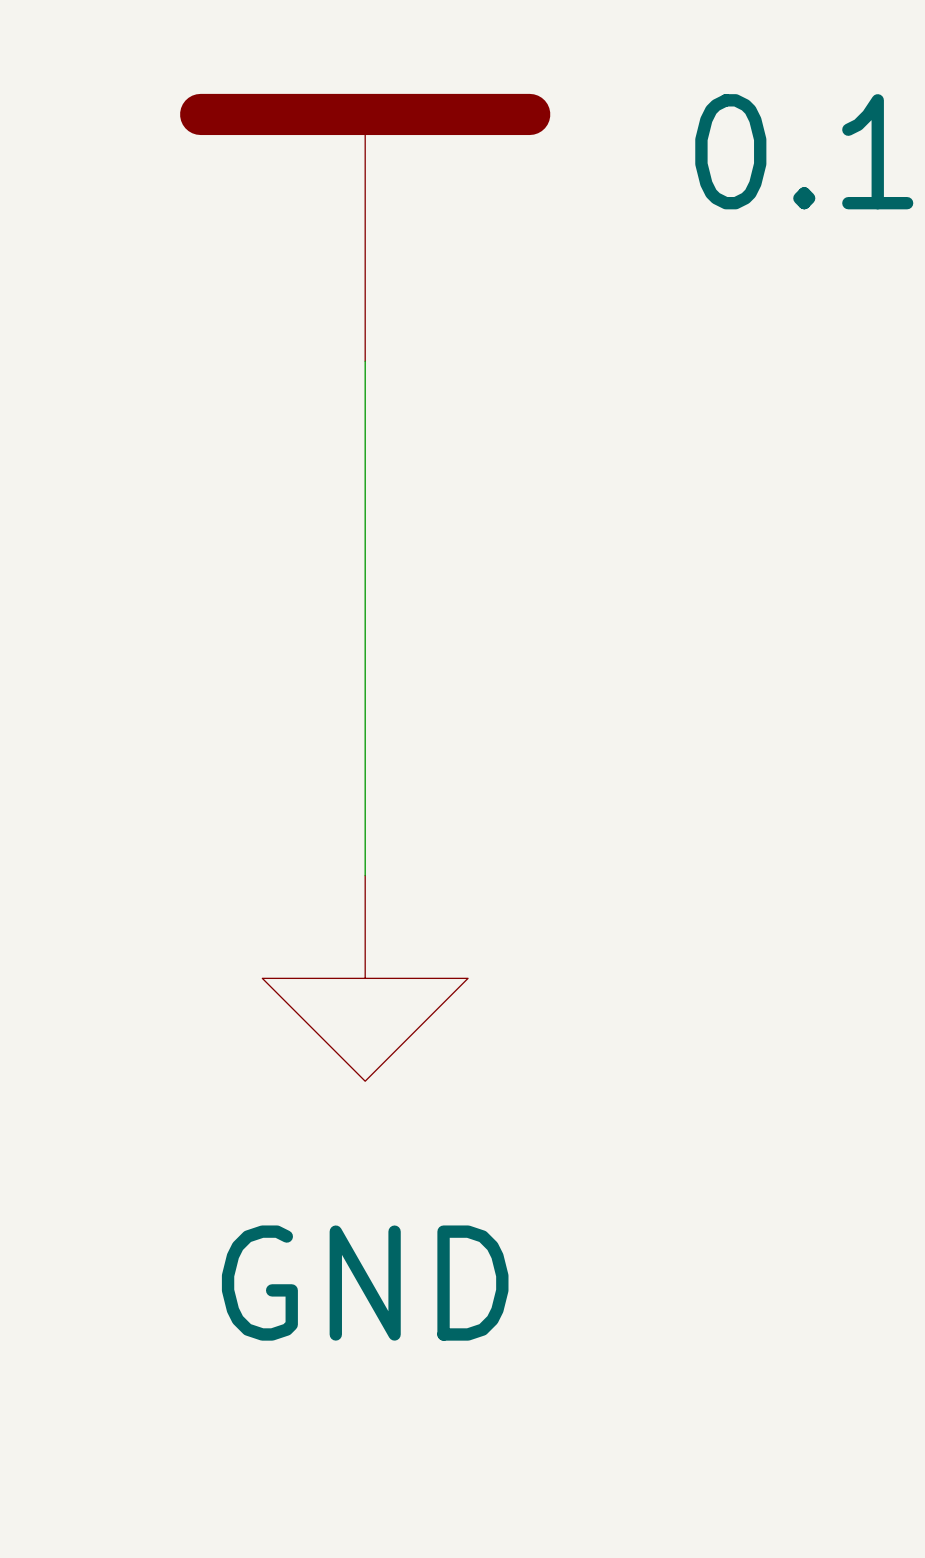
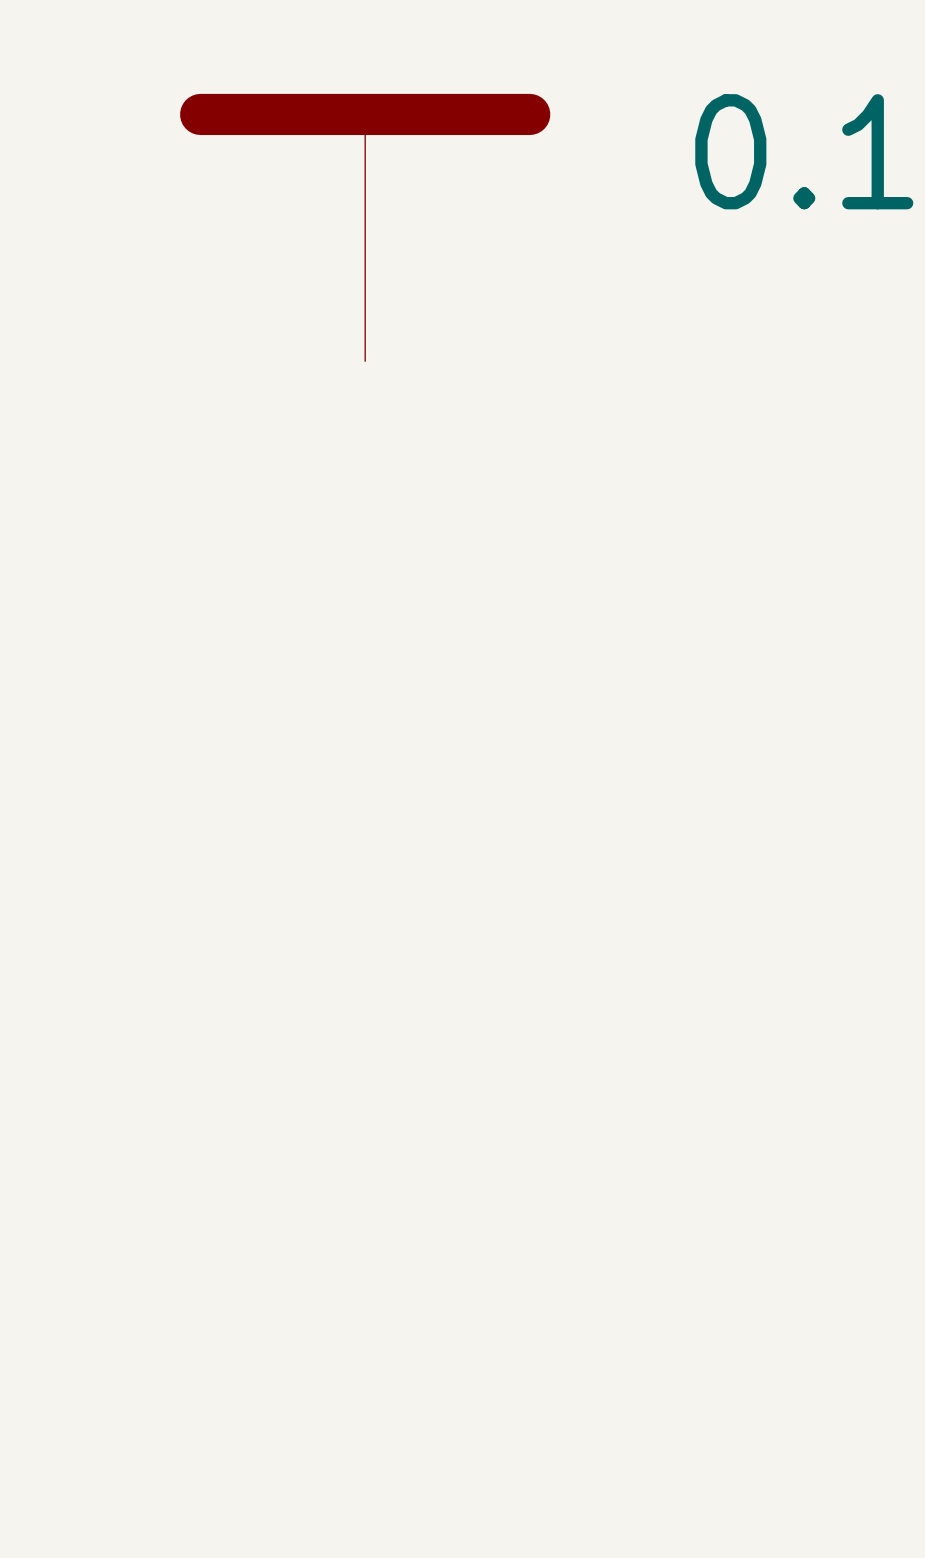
wire: (365, 361) (365, 875) -> none
power symbol: GND (365, 978) -> none

